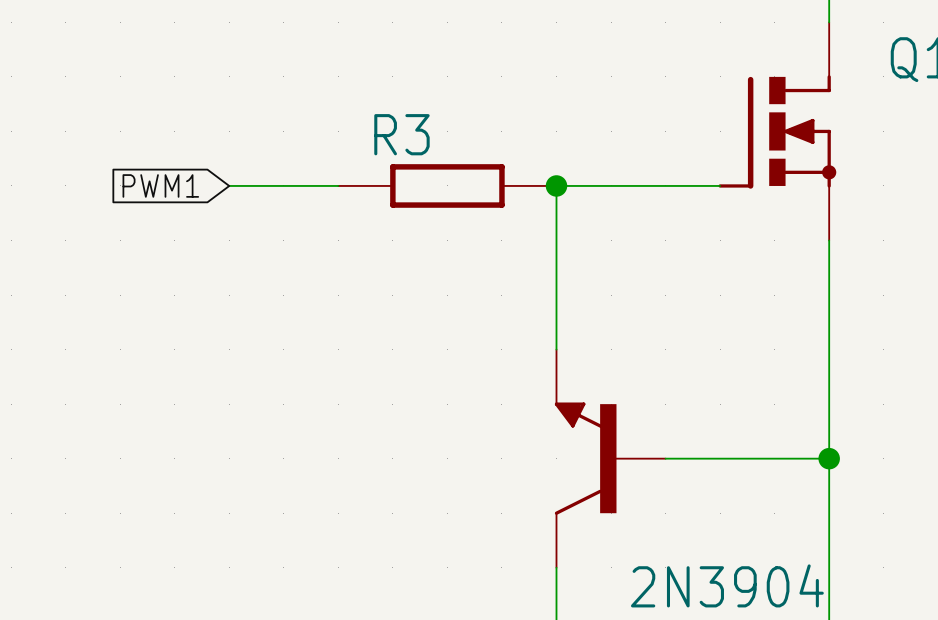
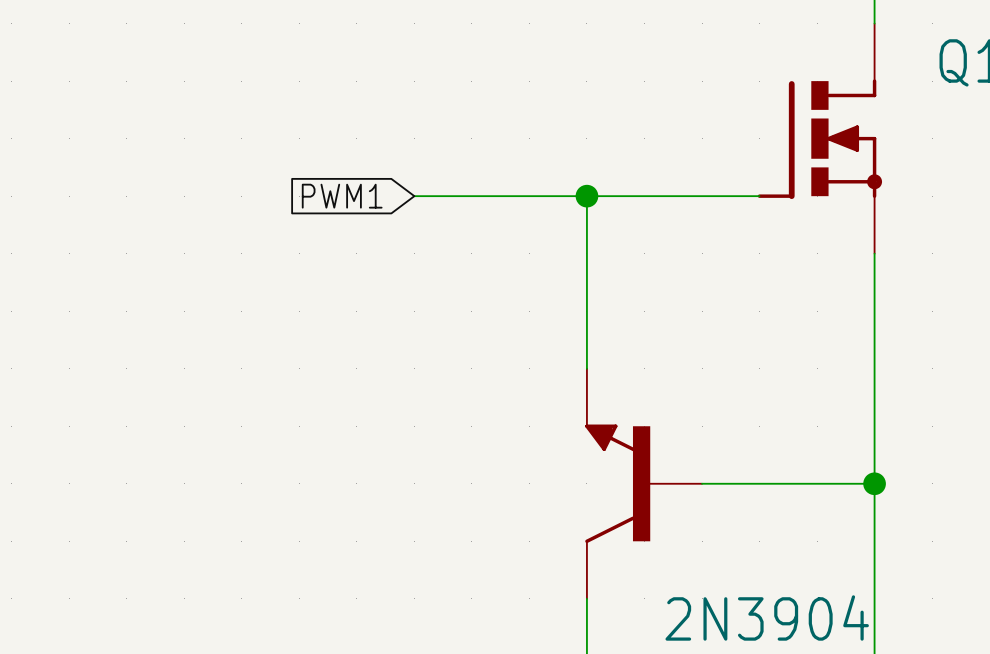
global label position: PWM1 (160, 185) -> PWM1 (342, 196)
wire: (229, 185) (338, 185) -> none
wire: none -> (414, 196) (586, 196)
R3: (447, 185) -> none

